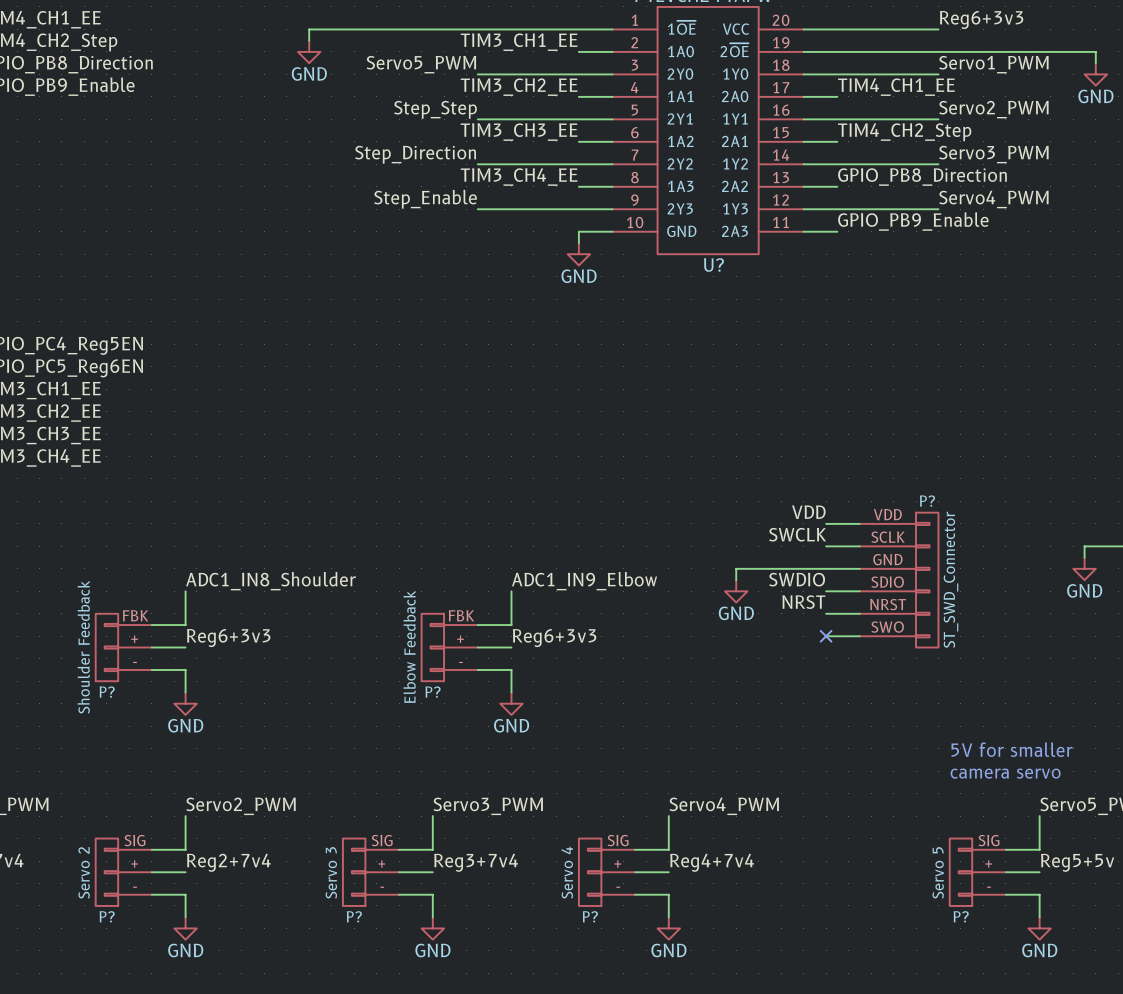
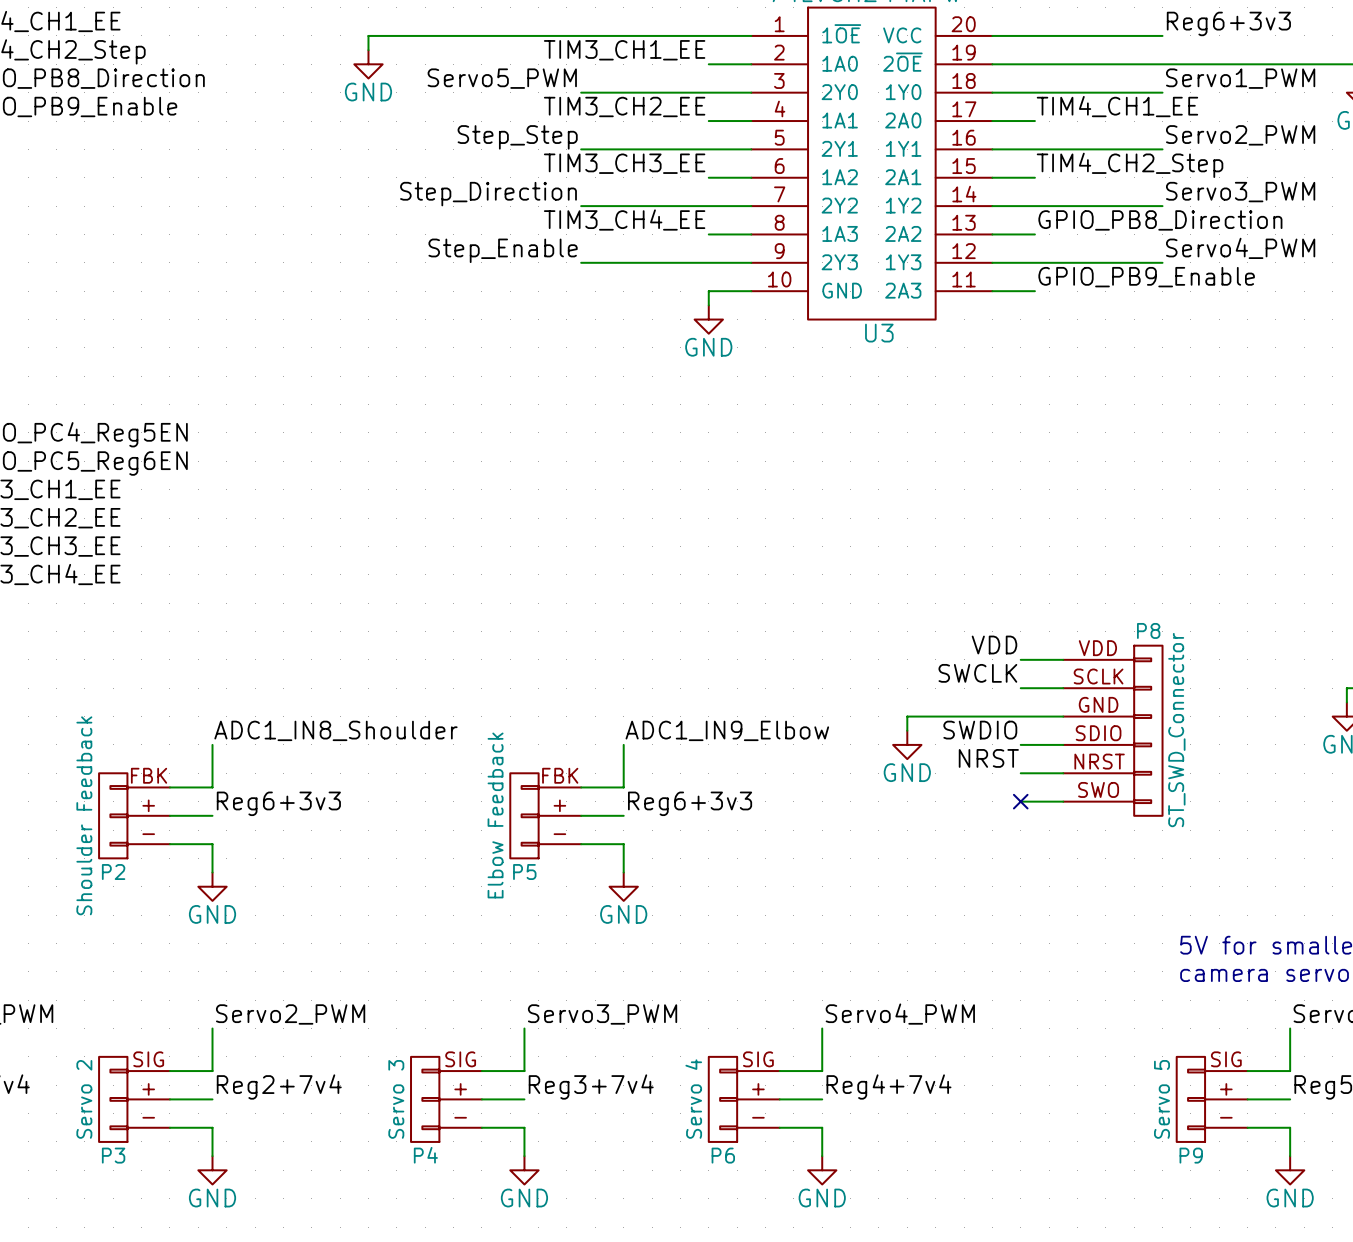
U? name: U? (713, 265) -> U3 (879, 333)
P? name: P? (927, 501) -> P8 (1148, 630)
P? name: P? (107, 692) -> P2 (113, 872)
P? name: P? (433, 692) -> P5 (524, 872)
P? name: P? (107, 916) -> P3 (113, 1155)
P? name: P? (354, 916) -> P4 (425, 1155)
P? name: P? (590, 916) -> P6 (723, 1155)
P? name: P? (961, 916) -> P9 (1191, 1155)

